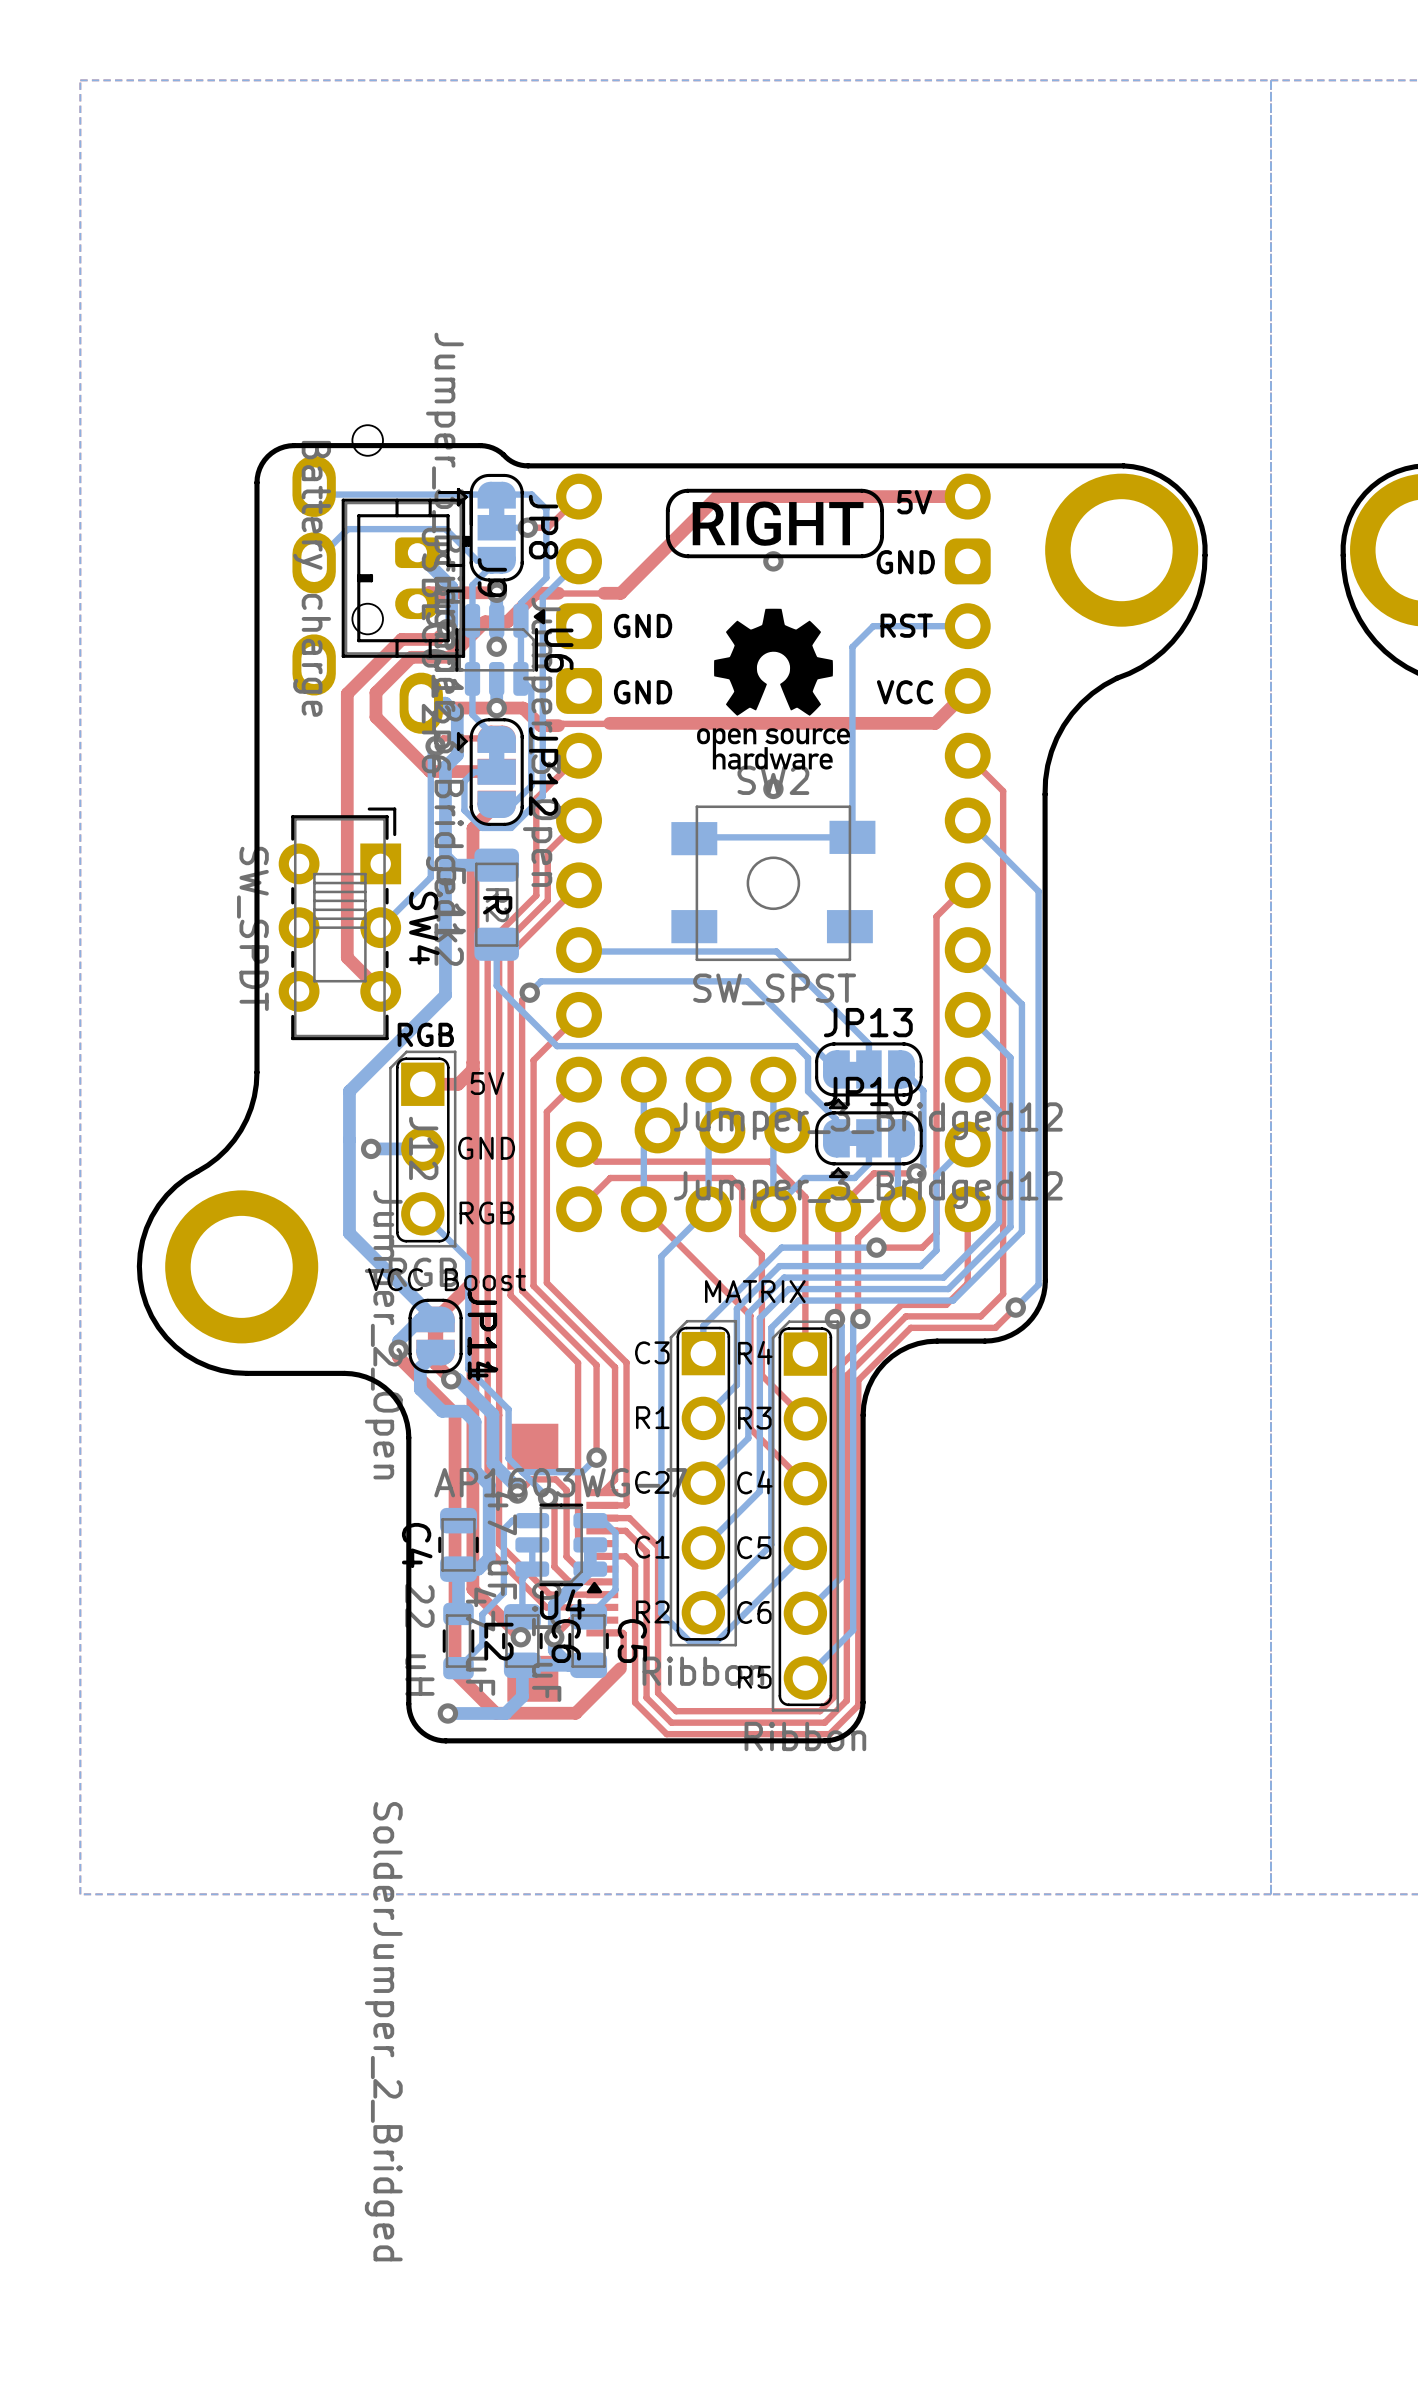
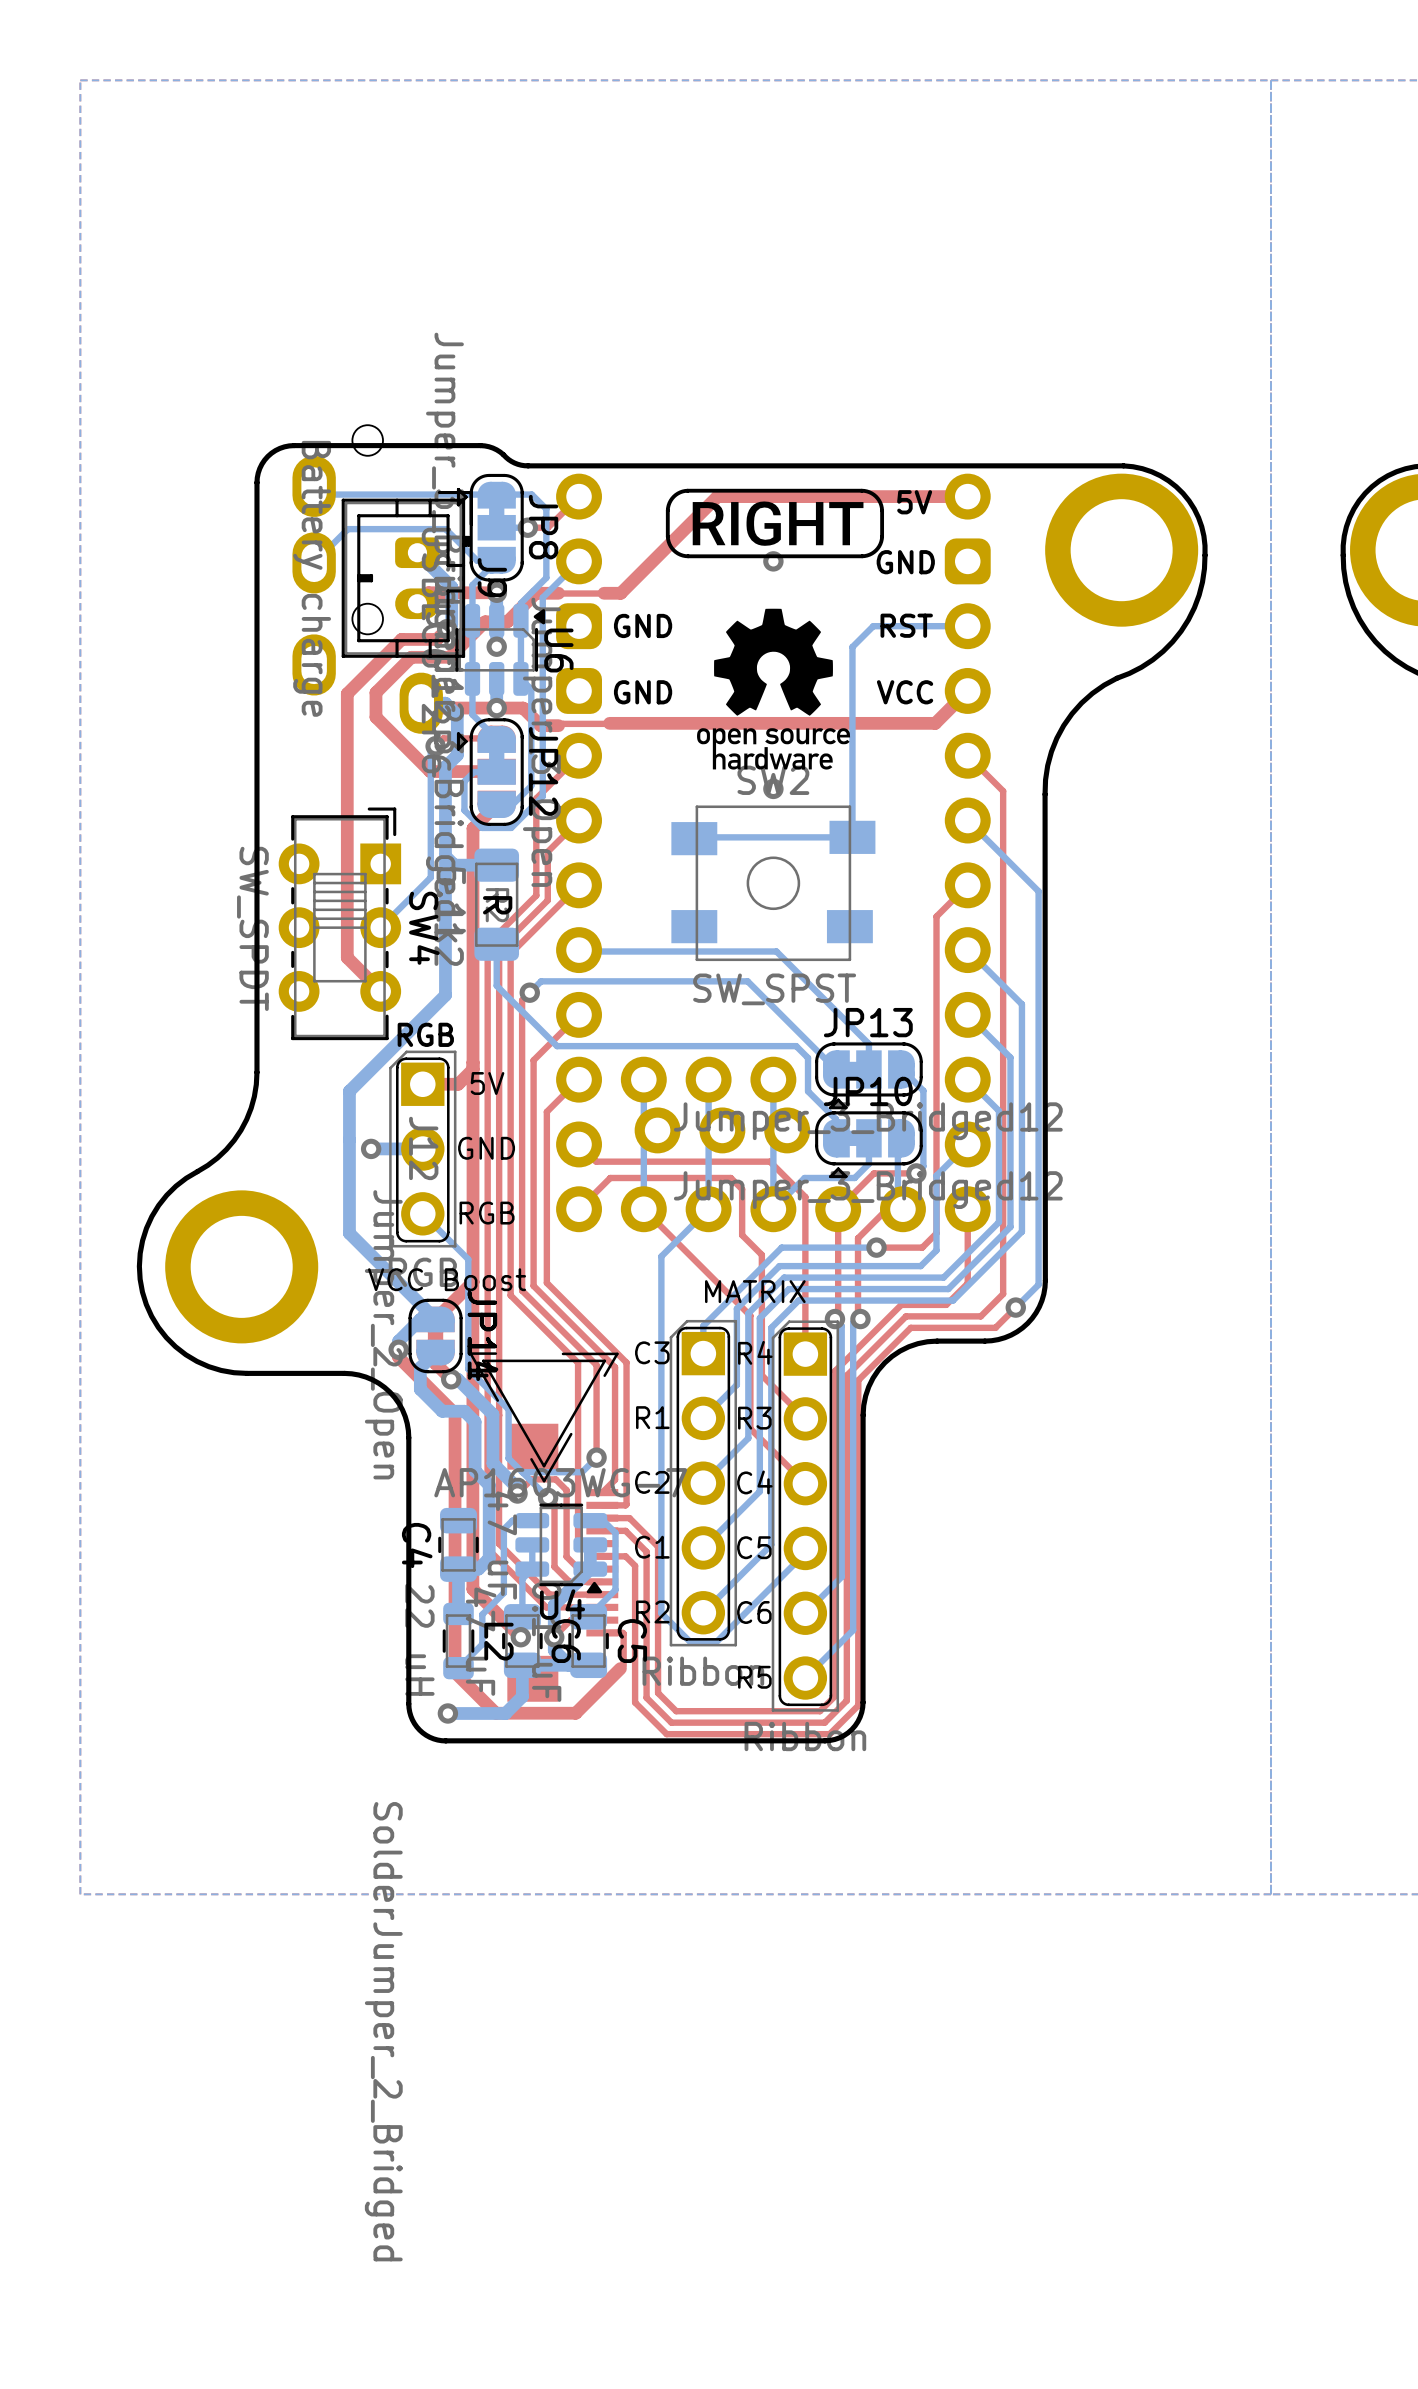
line: none -> (495, 1353) (470, 1353) (497, 1400)
line: none -> (562, 1353) (617, 1353) (604, 1375)
line: none -> (604, 1360) (483, 1360) (544, 1466) (604, 1360)
line: none -> (571, 1434) (544, 1481) (531, 1459)

